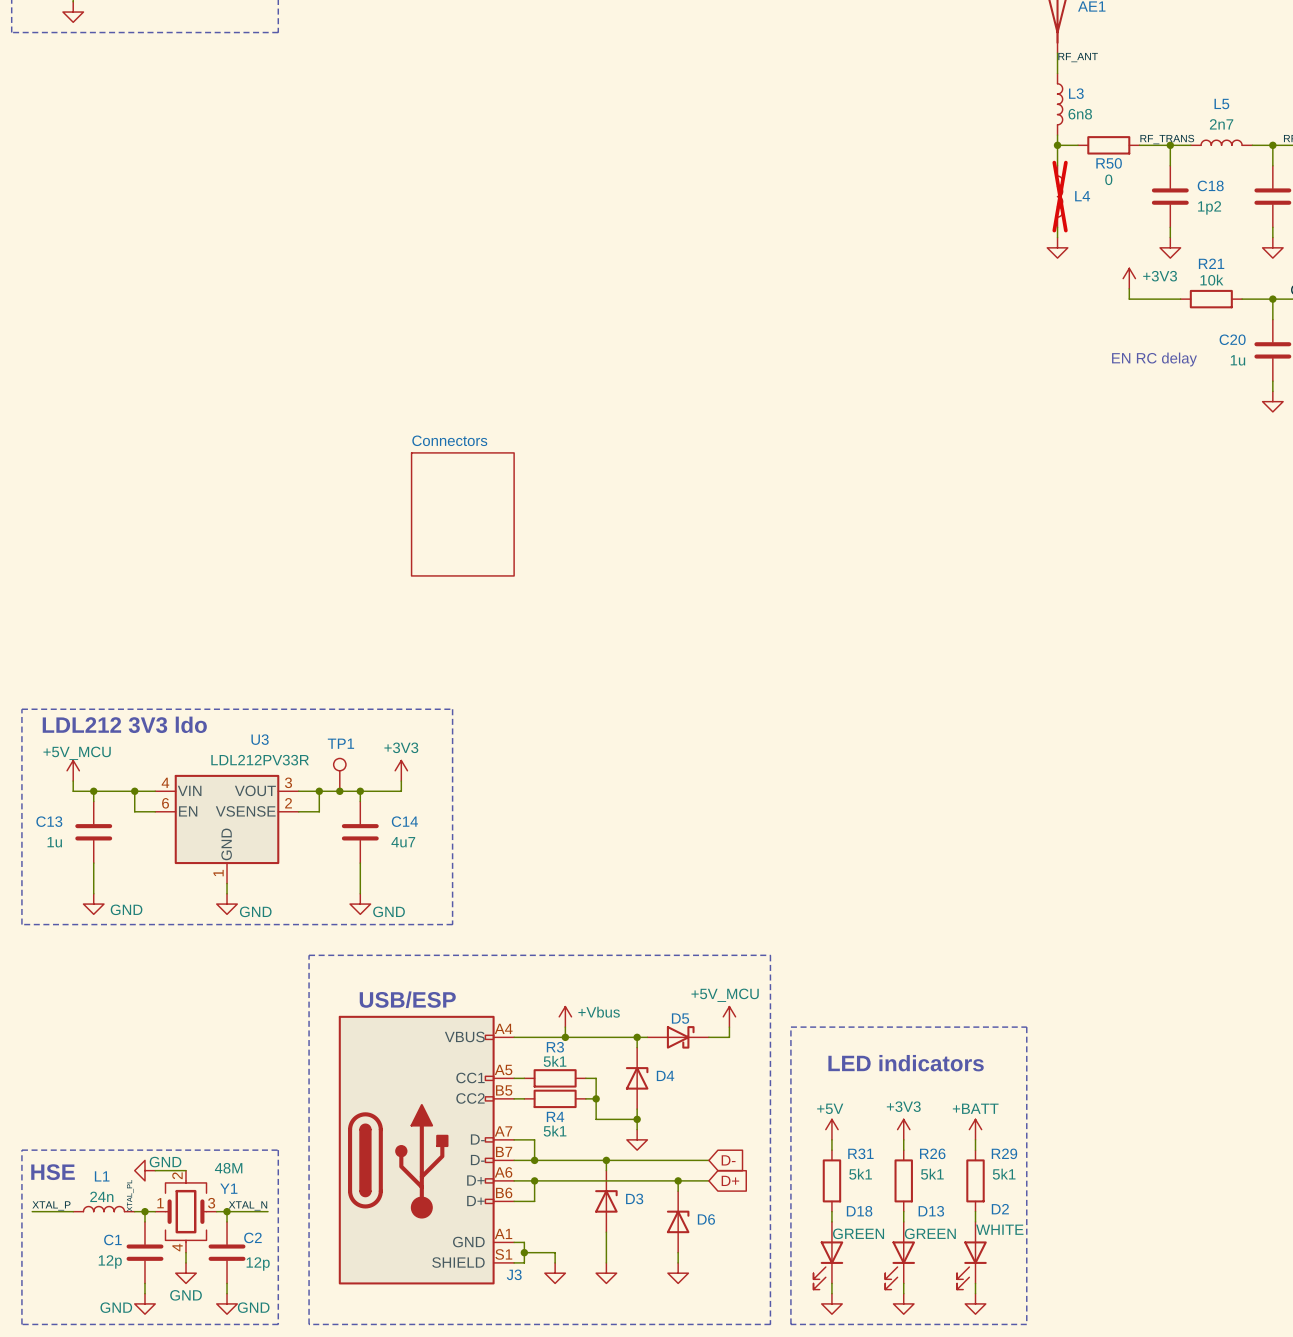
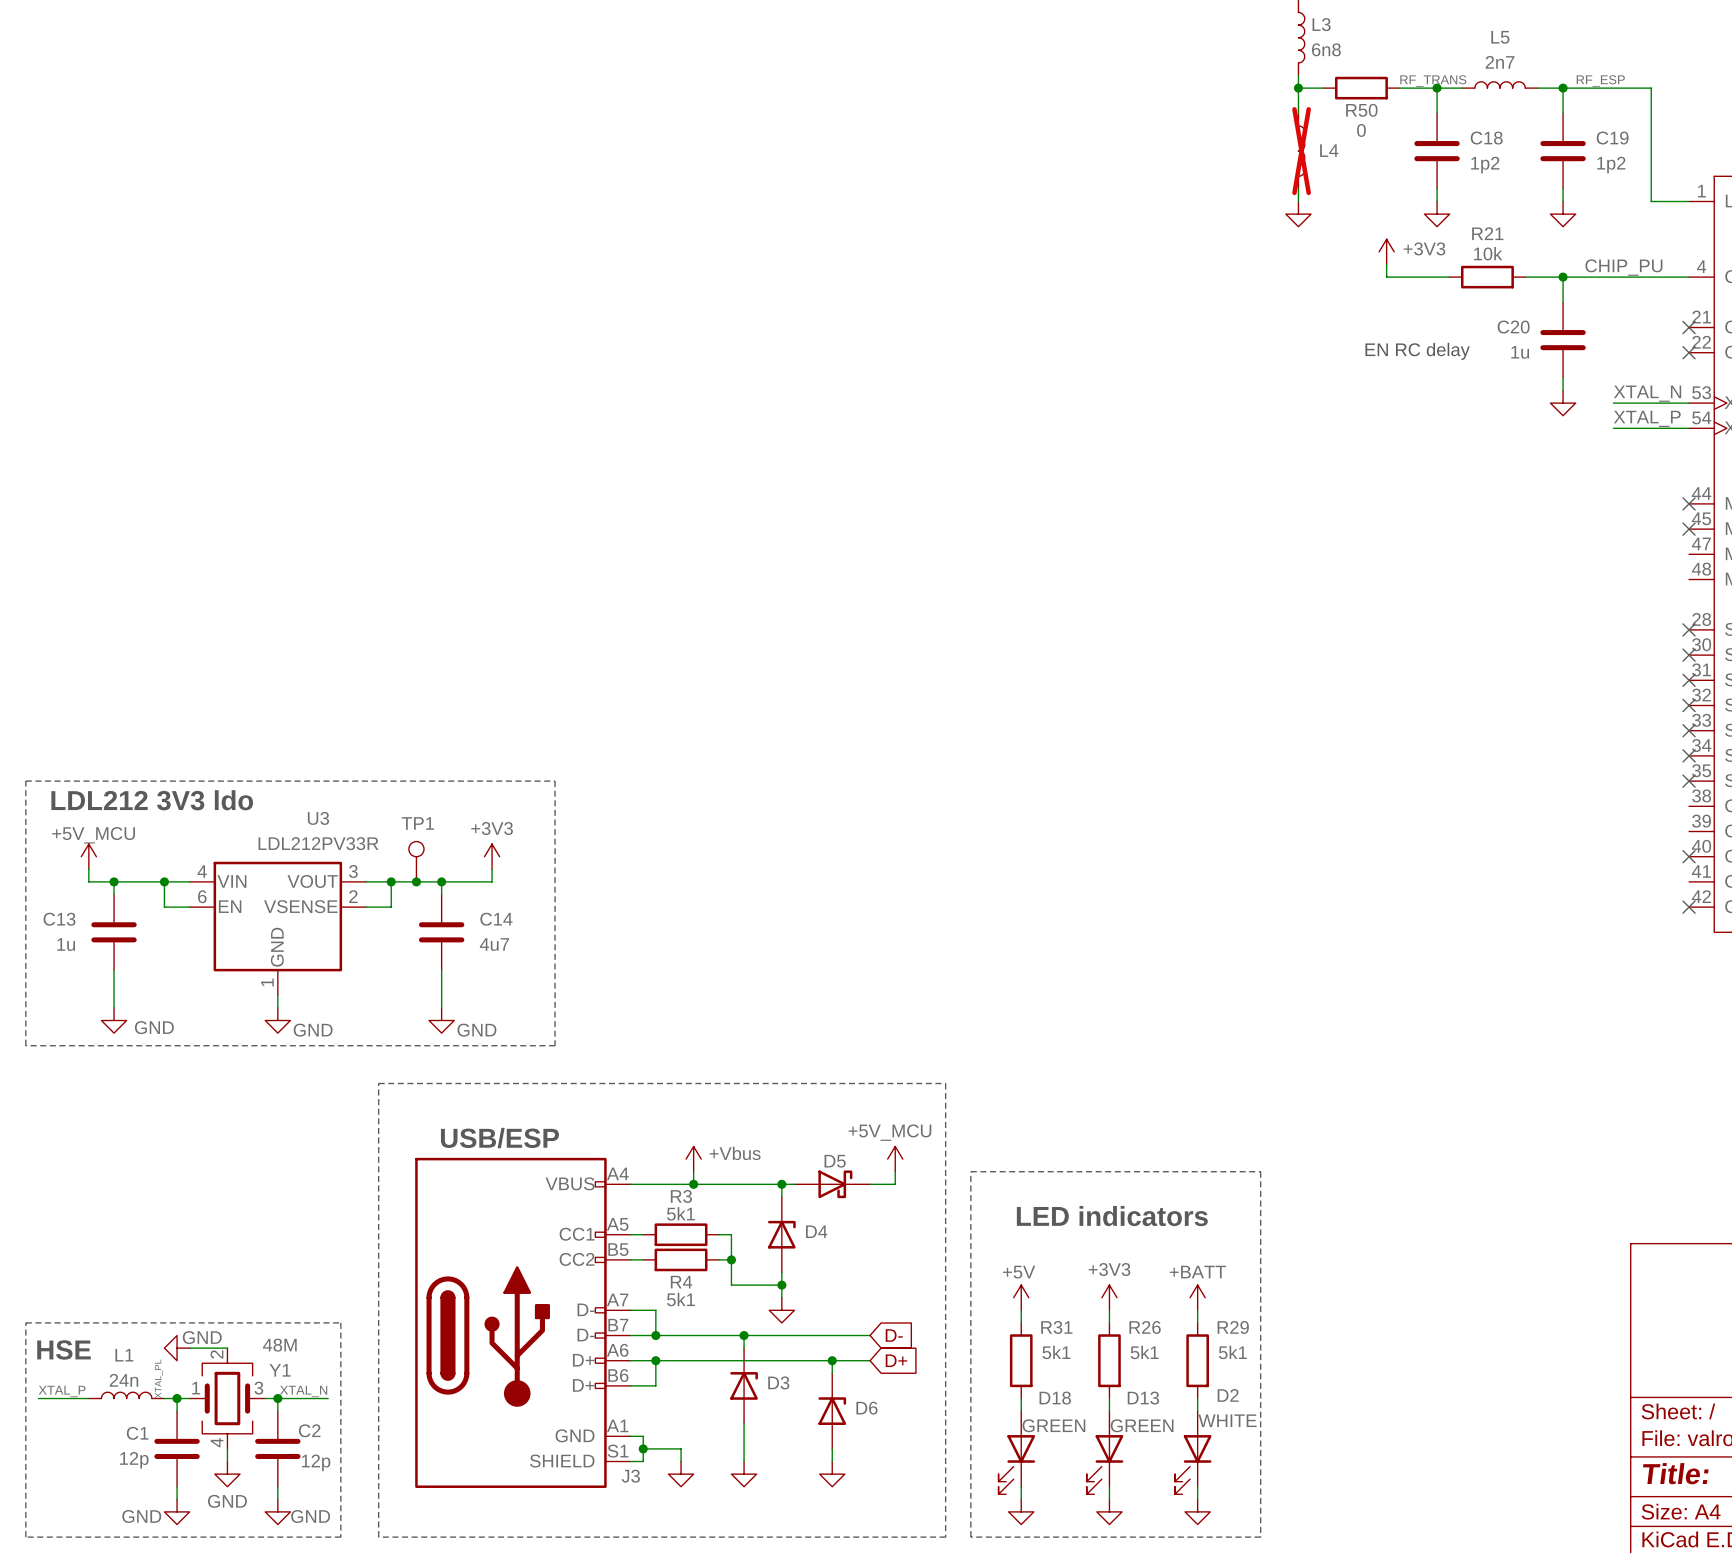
sheet Connectors: (462, 514) -> none

